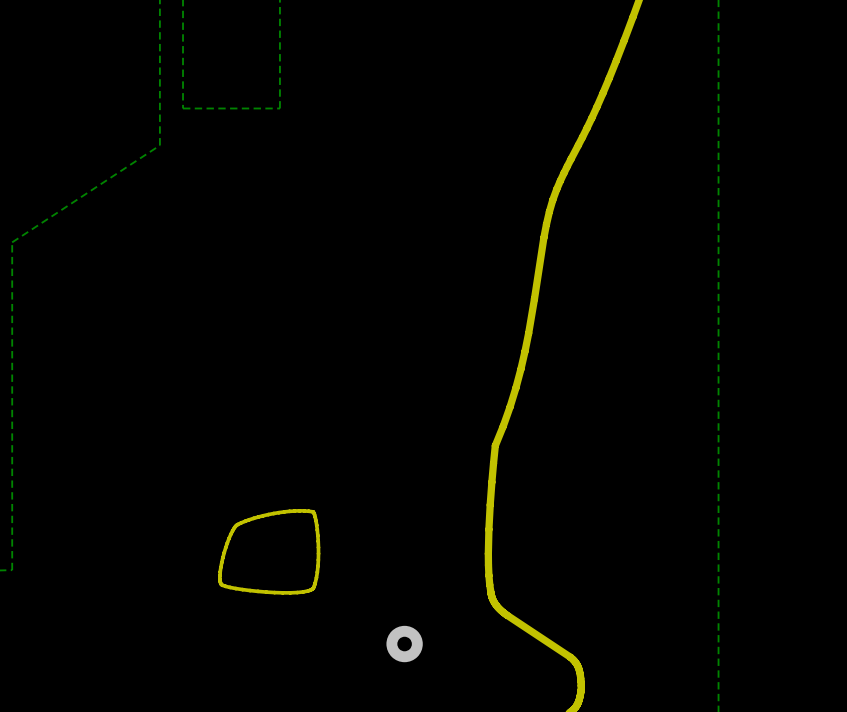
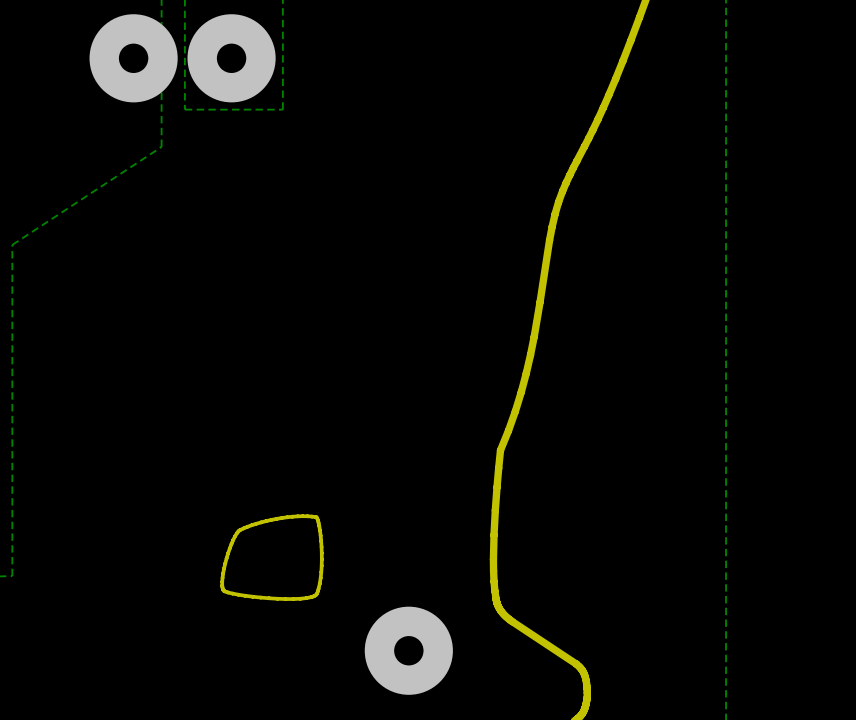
via: none -> (133, 58)
via: none -> (231, 58)
via size: [386, 625, 423, 663] -> [364, 606, 453, 695]

